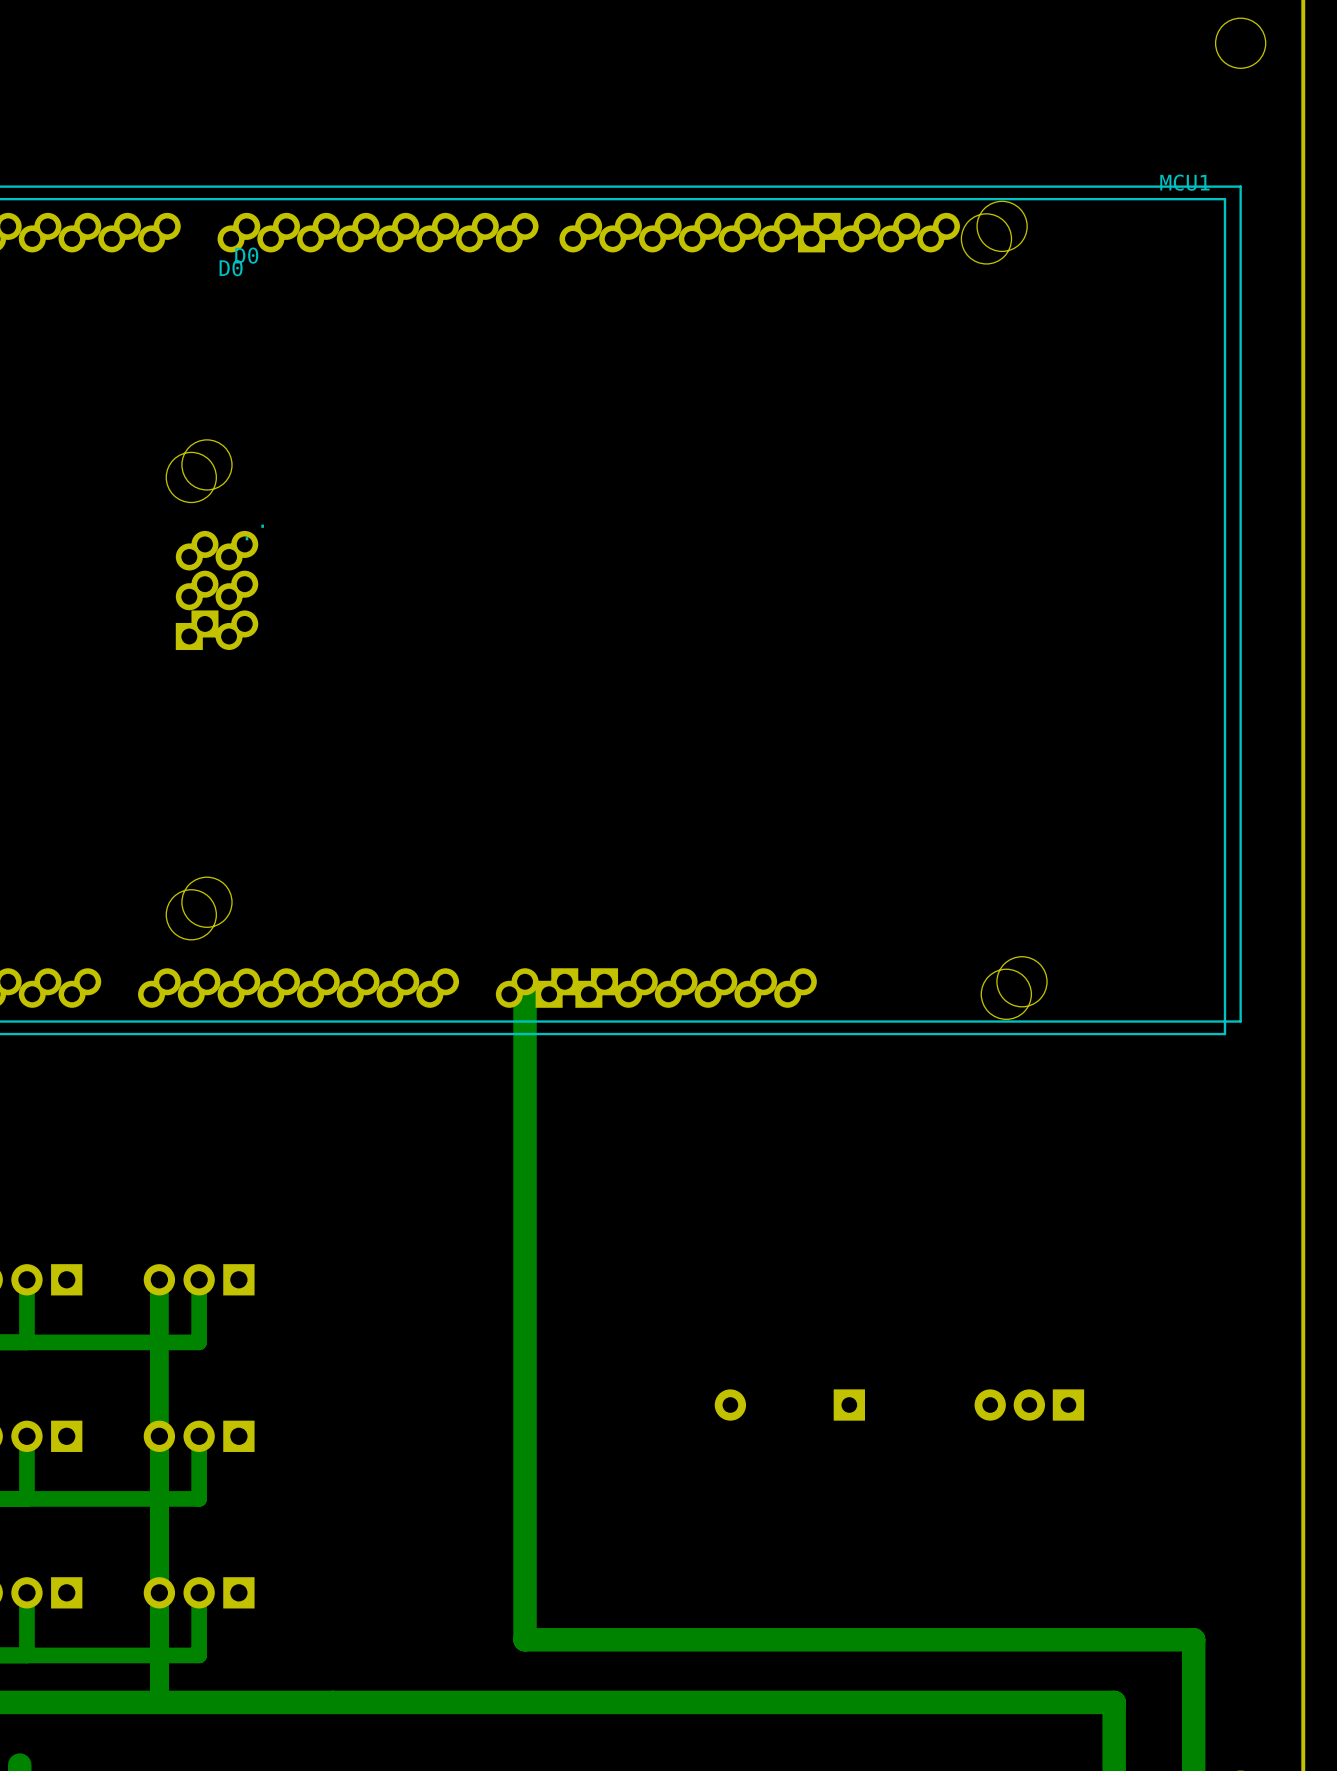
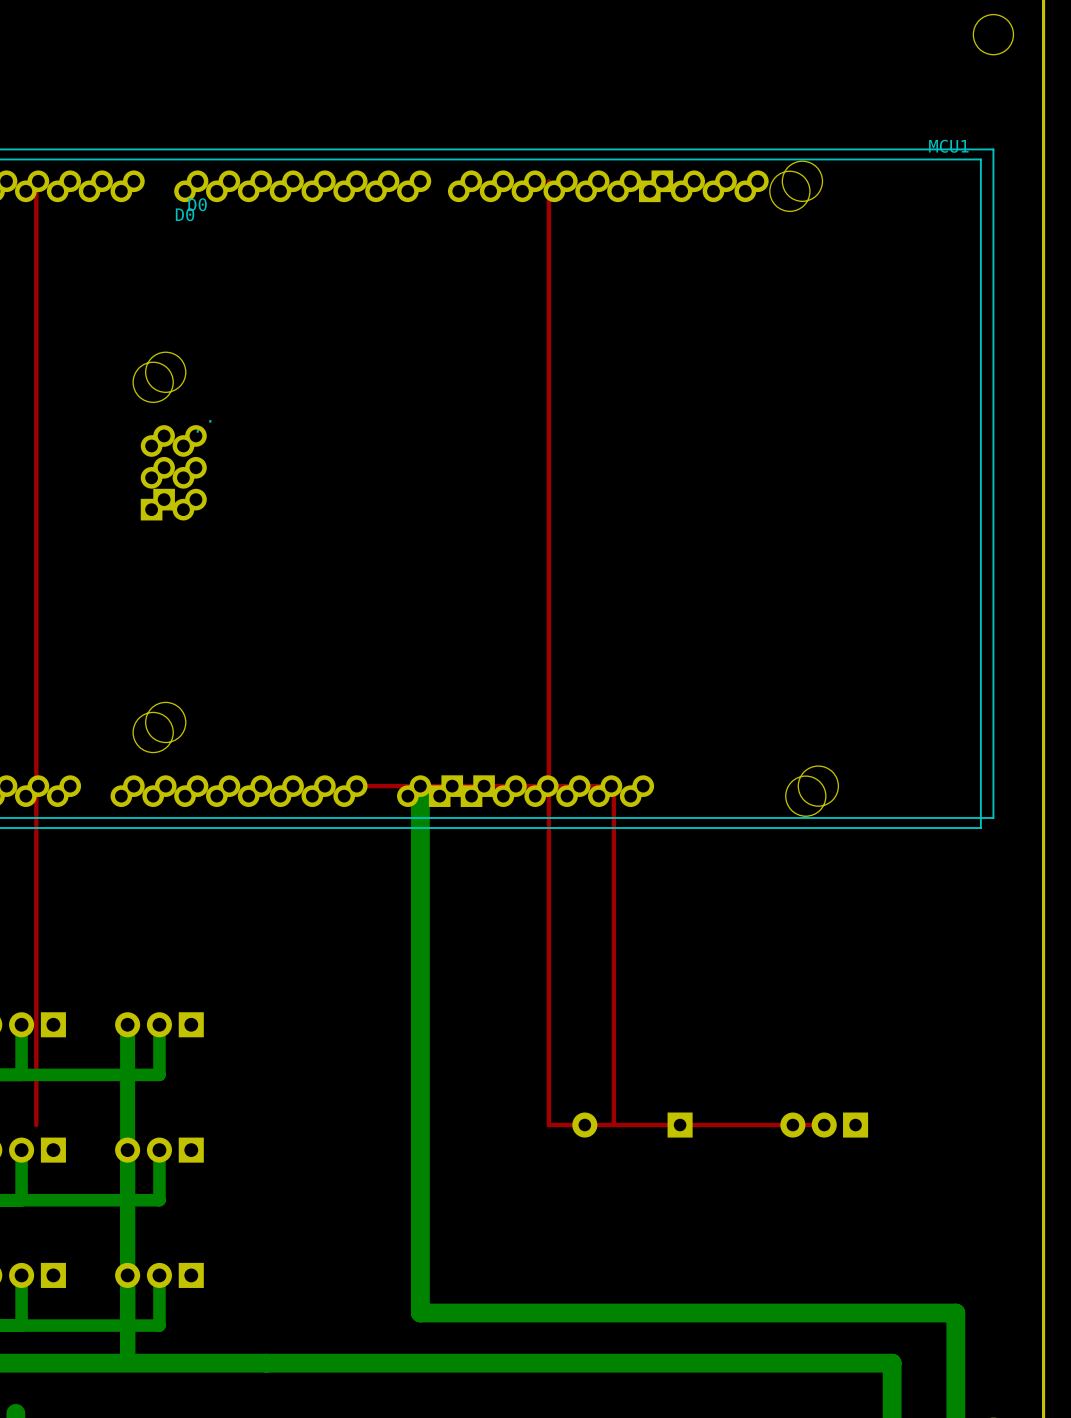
top track: none -> (36, 181) (36, 1125)
top track: none -> (548, 181) (548, 1125) (824, 1125)
top track: none -> (356, 786) (613, 786) (613, 1125)

